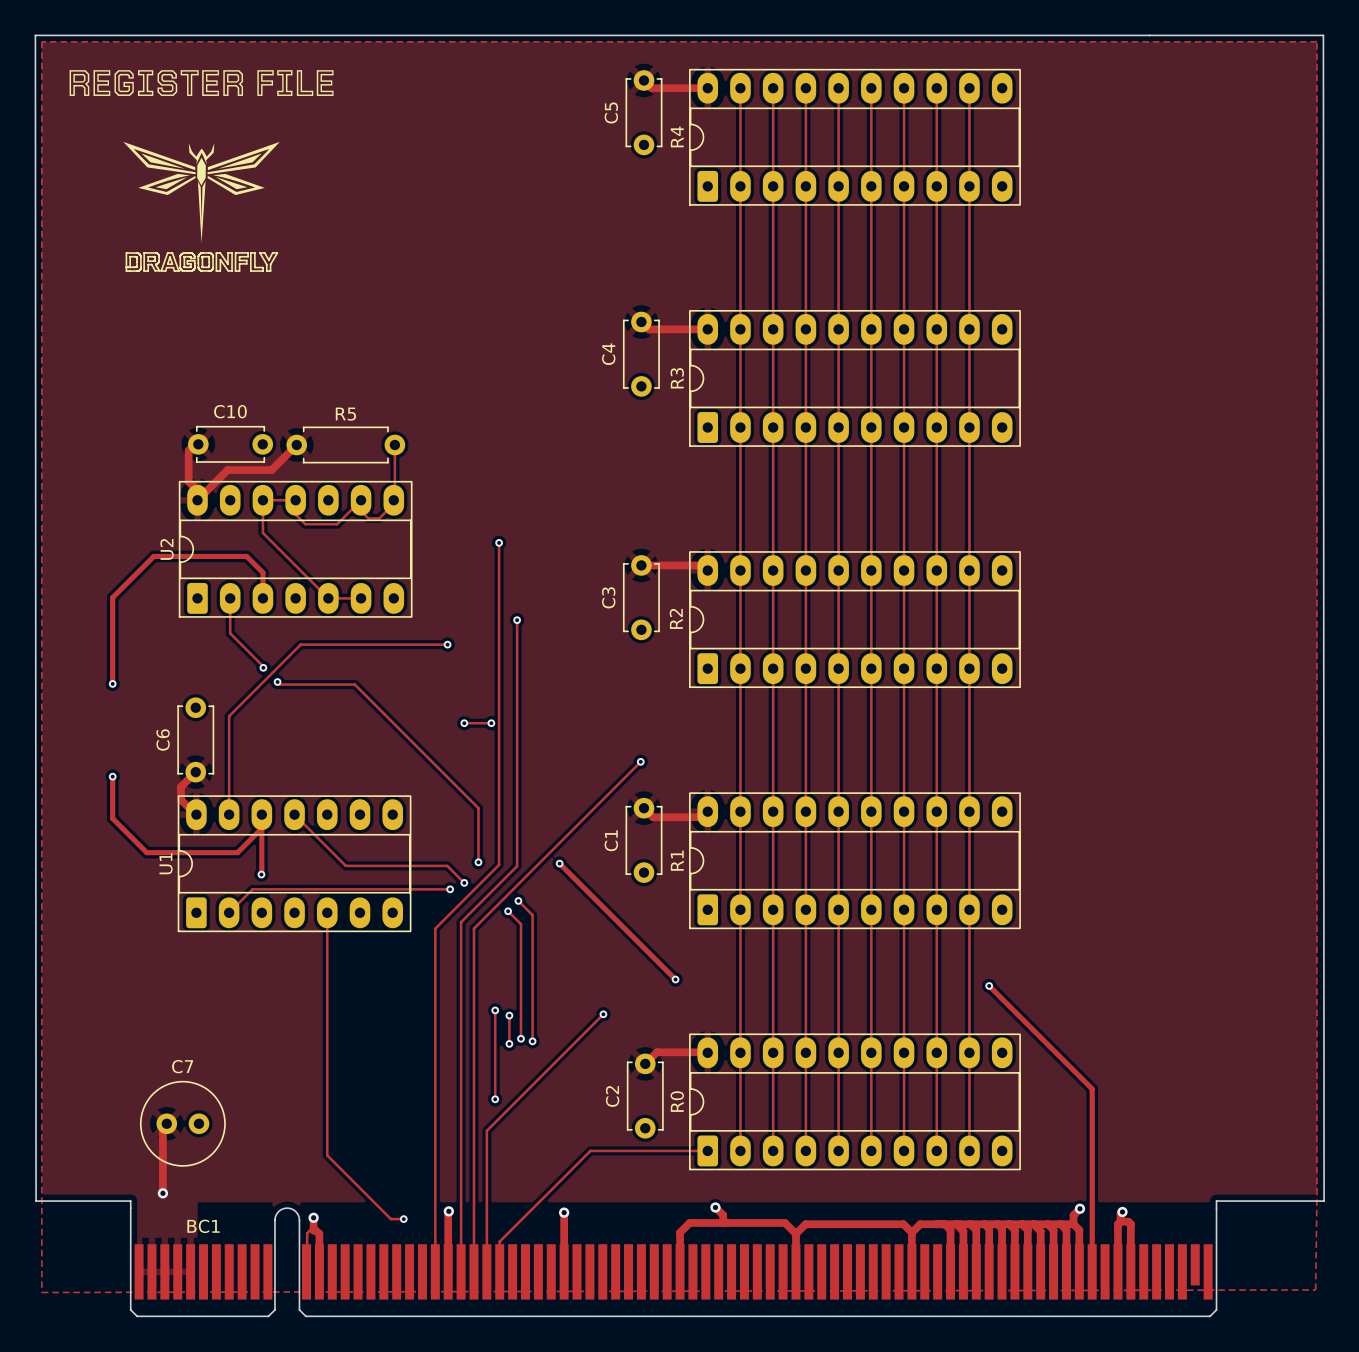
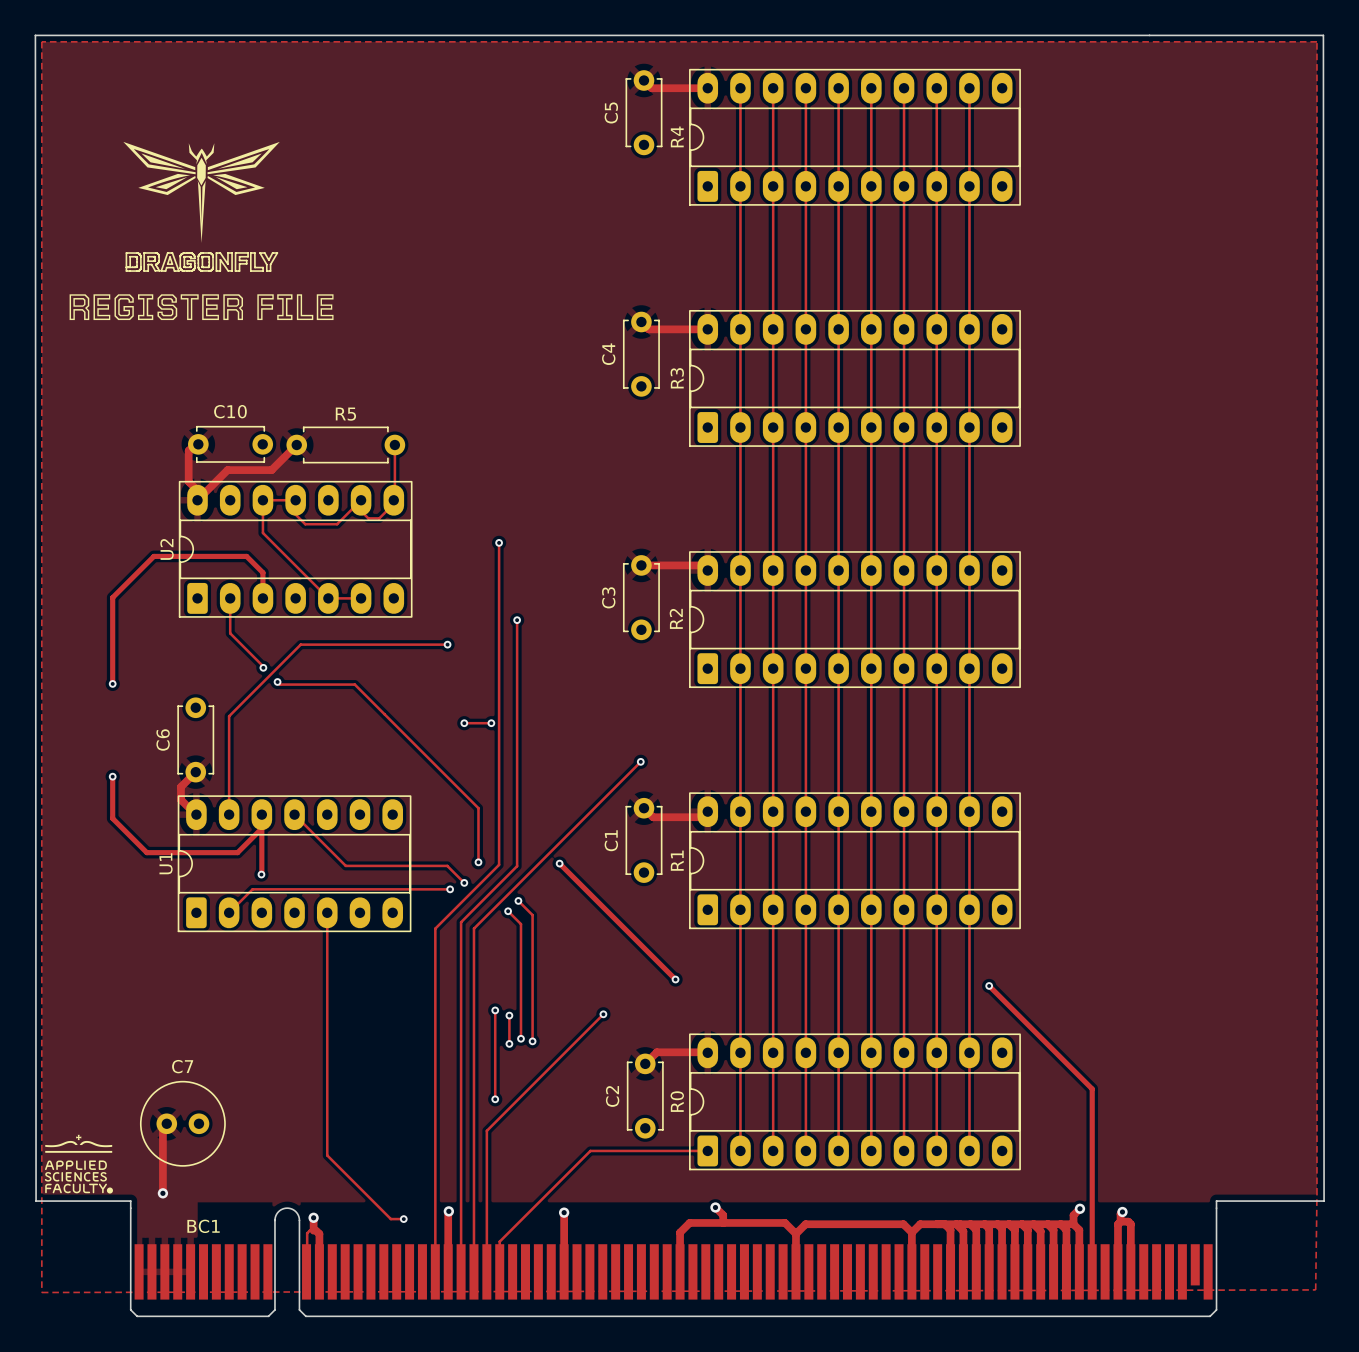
drawing position: (201, 83) -> (201, 307)
drawing: none -> [44, 1134, 113, 1194]

